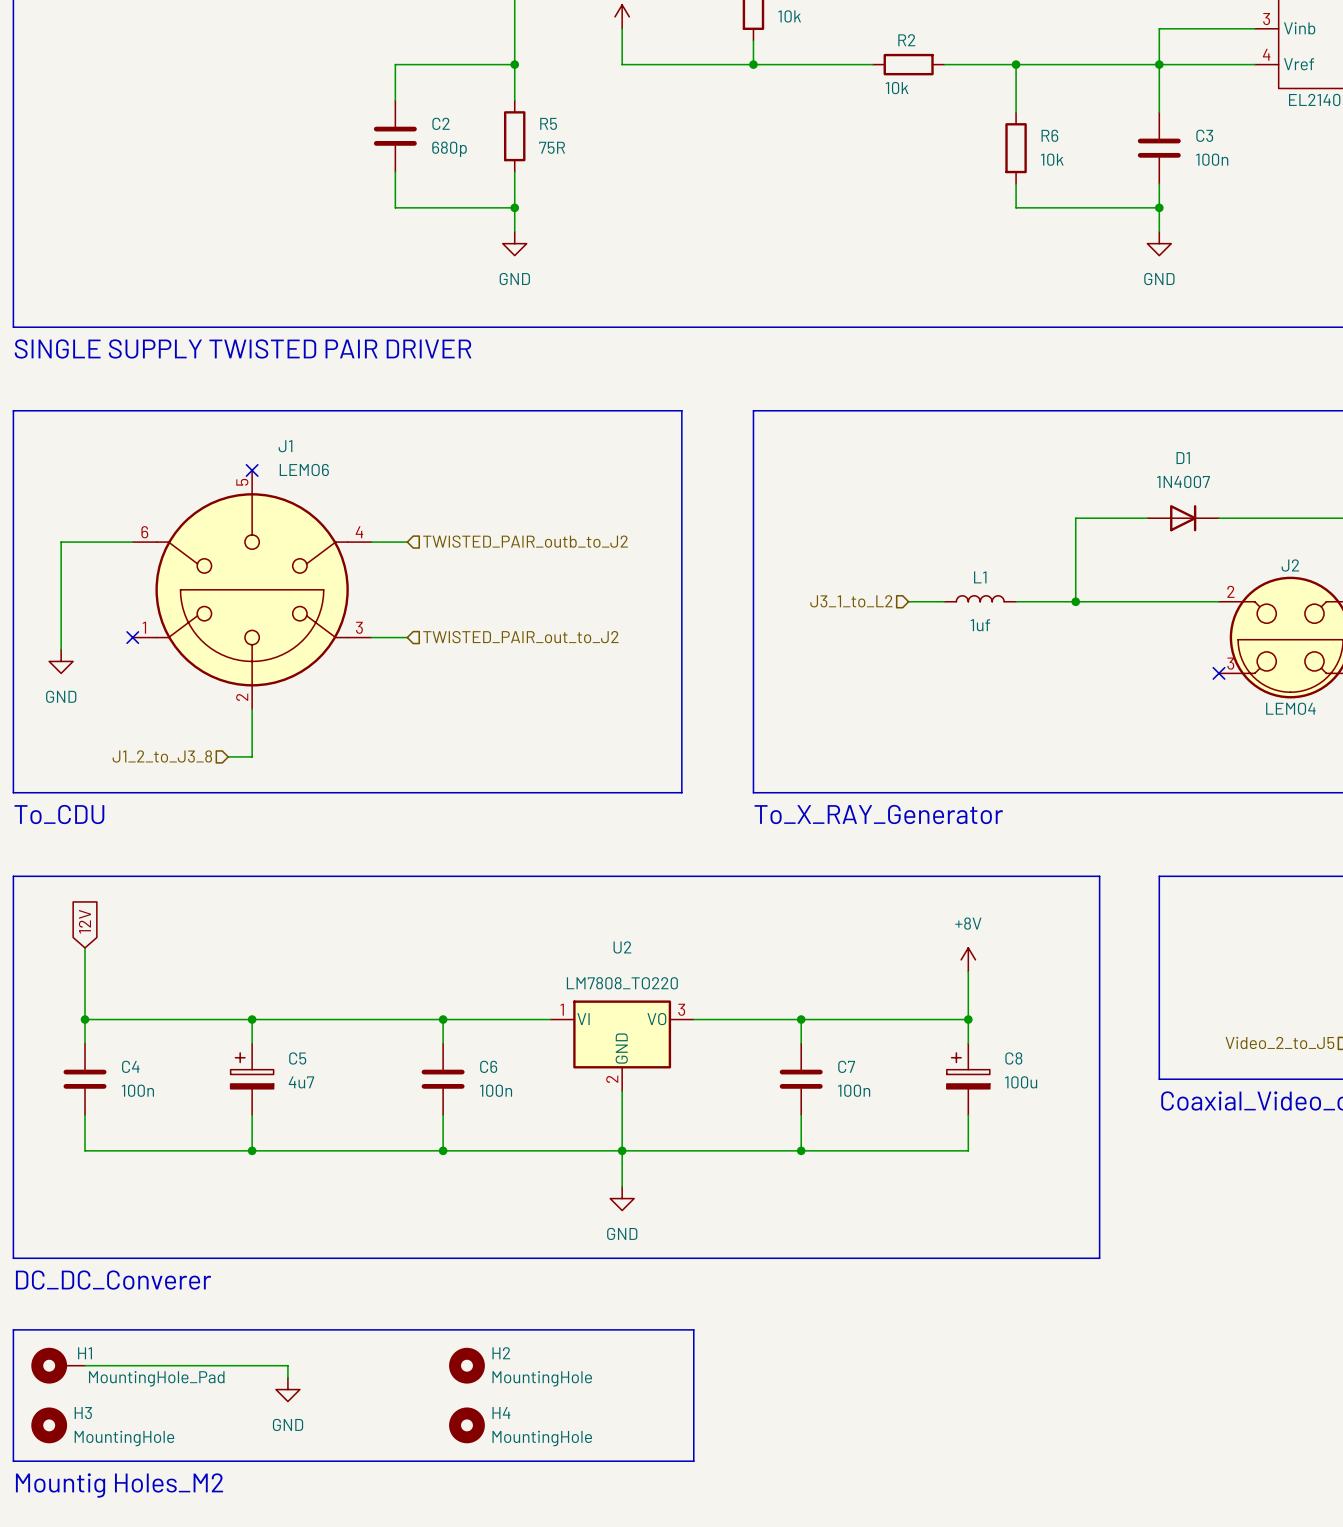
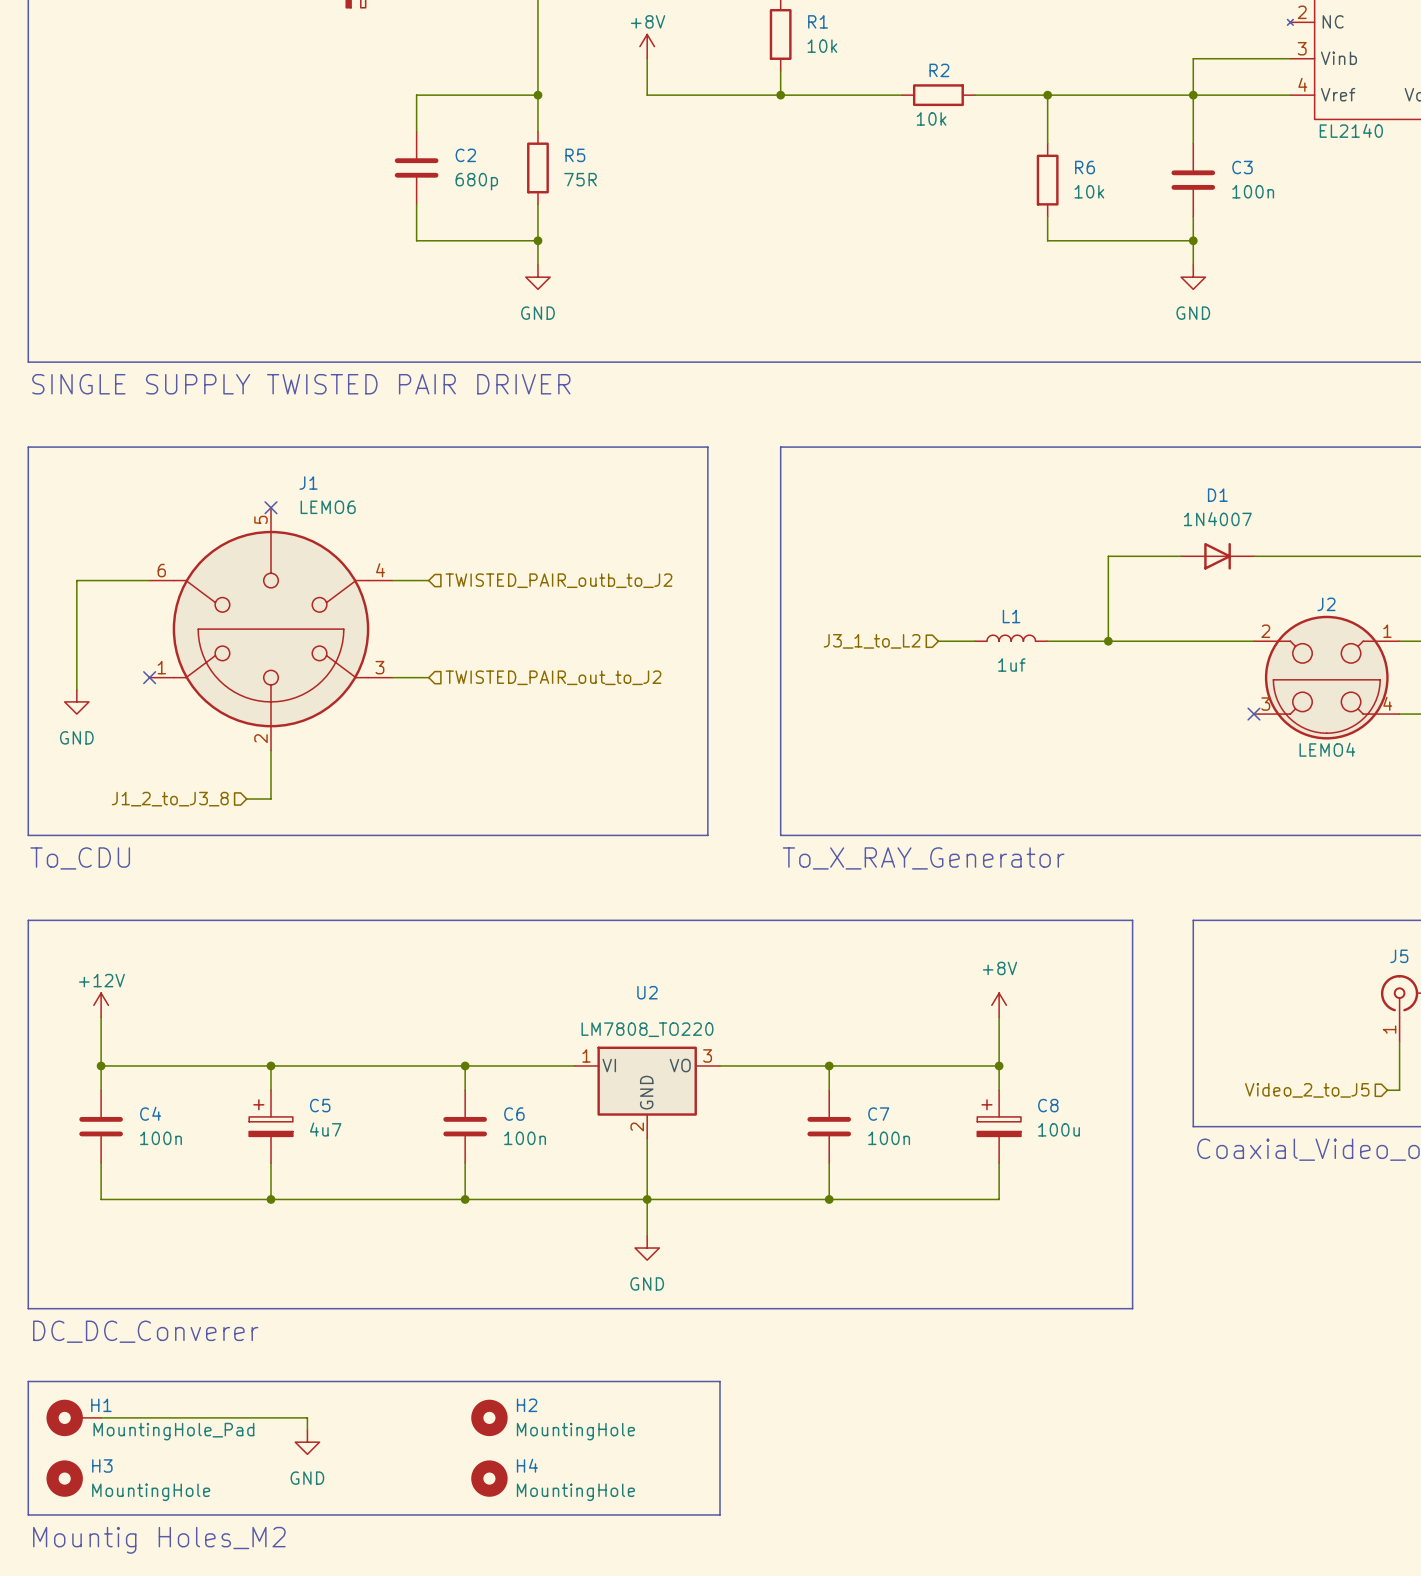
global label: 12V (84, 921) -> none
power symbol: none -> +12V (101, 1005)

